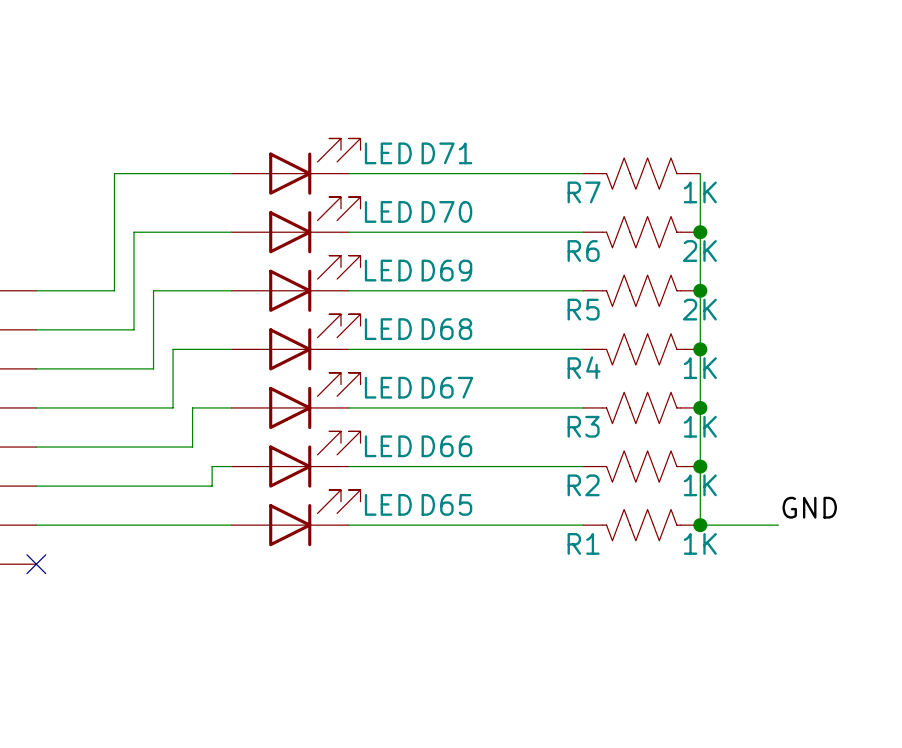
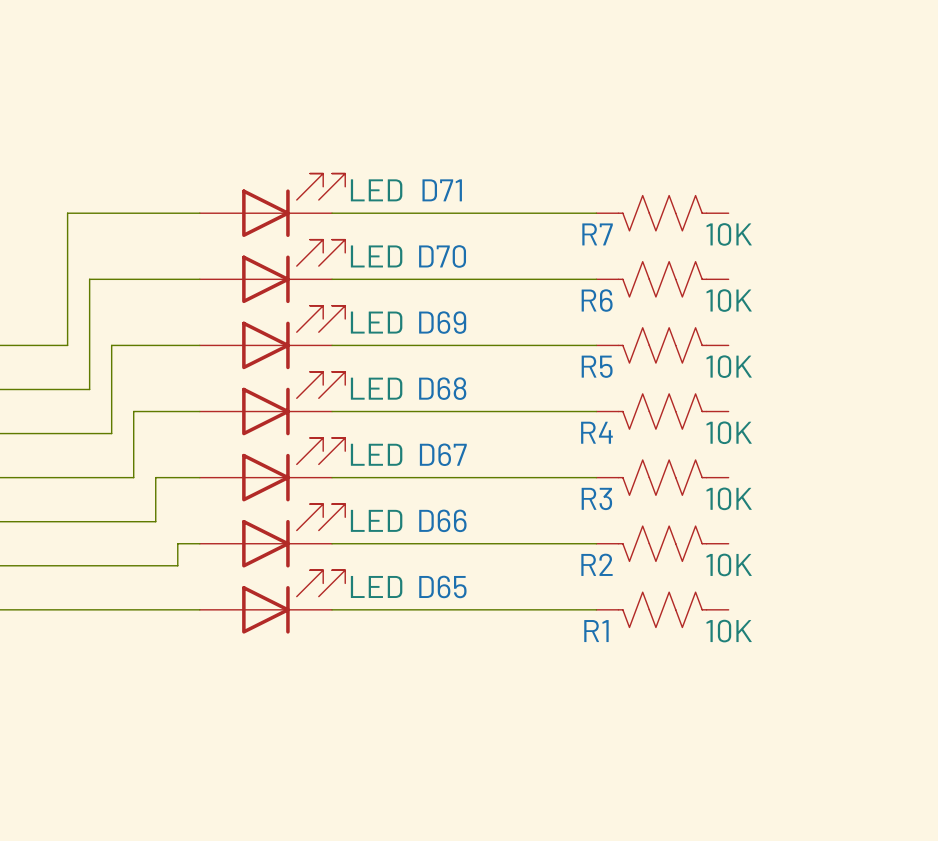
wire: (700, 173) (700, 525) (778, 525) -> none
R7 value: 1K (700, 192) -> 10K (729, 234)
junction: (700, 232) -> none
R6 value: 2K (699, 251) -> 10K (729, 300)
junction: (700, 290) -> none
R5 value: 2K (699, 309) -> 10K (729, 366)
junction: (700, 349) -> none
R4 value: 1K (700, 368) -> 10K (729, 432)
junction: (700, 407) -> none
R3 value: 1K (700, 426) -> 10K (729, 498)
junction: (700, 466) -> none
R2 value: 1K (700, 485) -> 10K (729, 564)
label: GND (809, 507) -> none
junction: (700, 525) -> none
R1 value: 1K (700, 543) -> 10K (729, 631)

